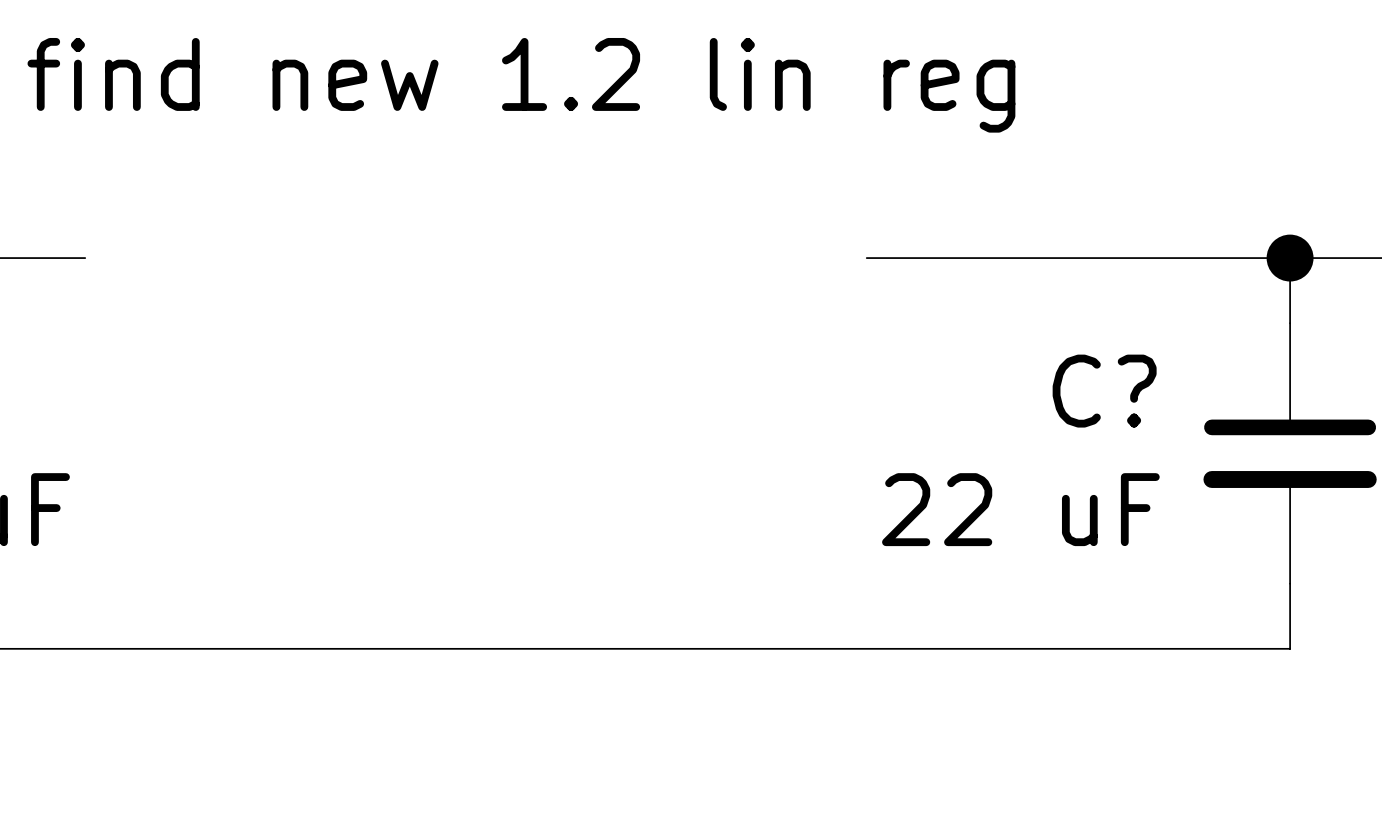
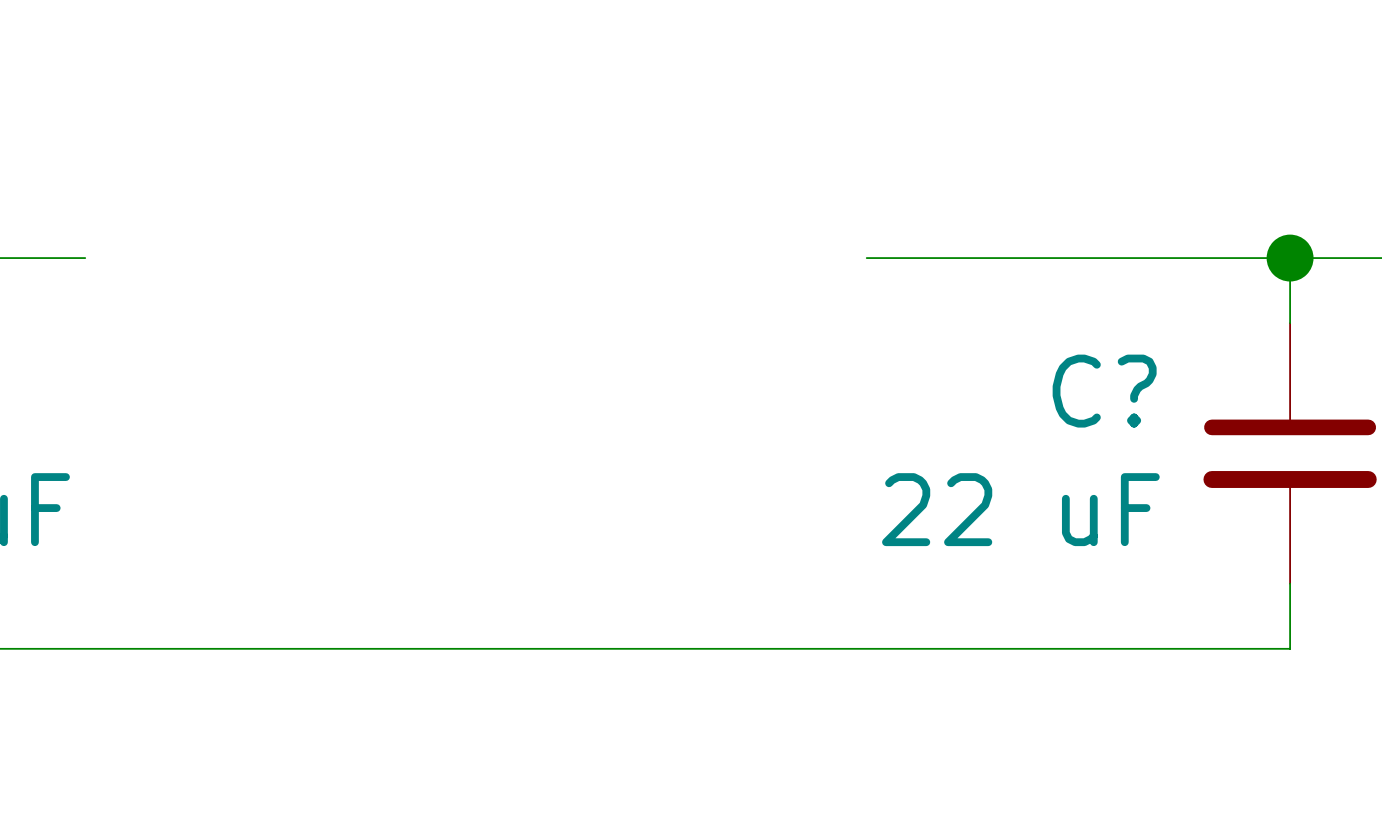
text: find new 1.2 lin reg (521, 85) -> none

